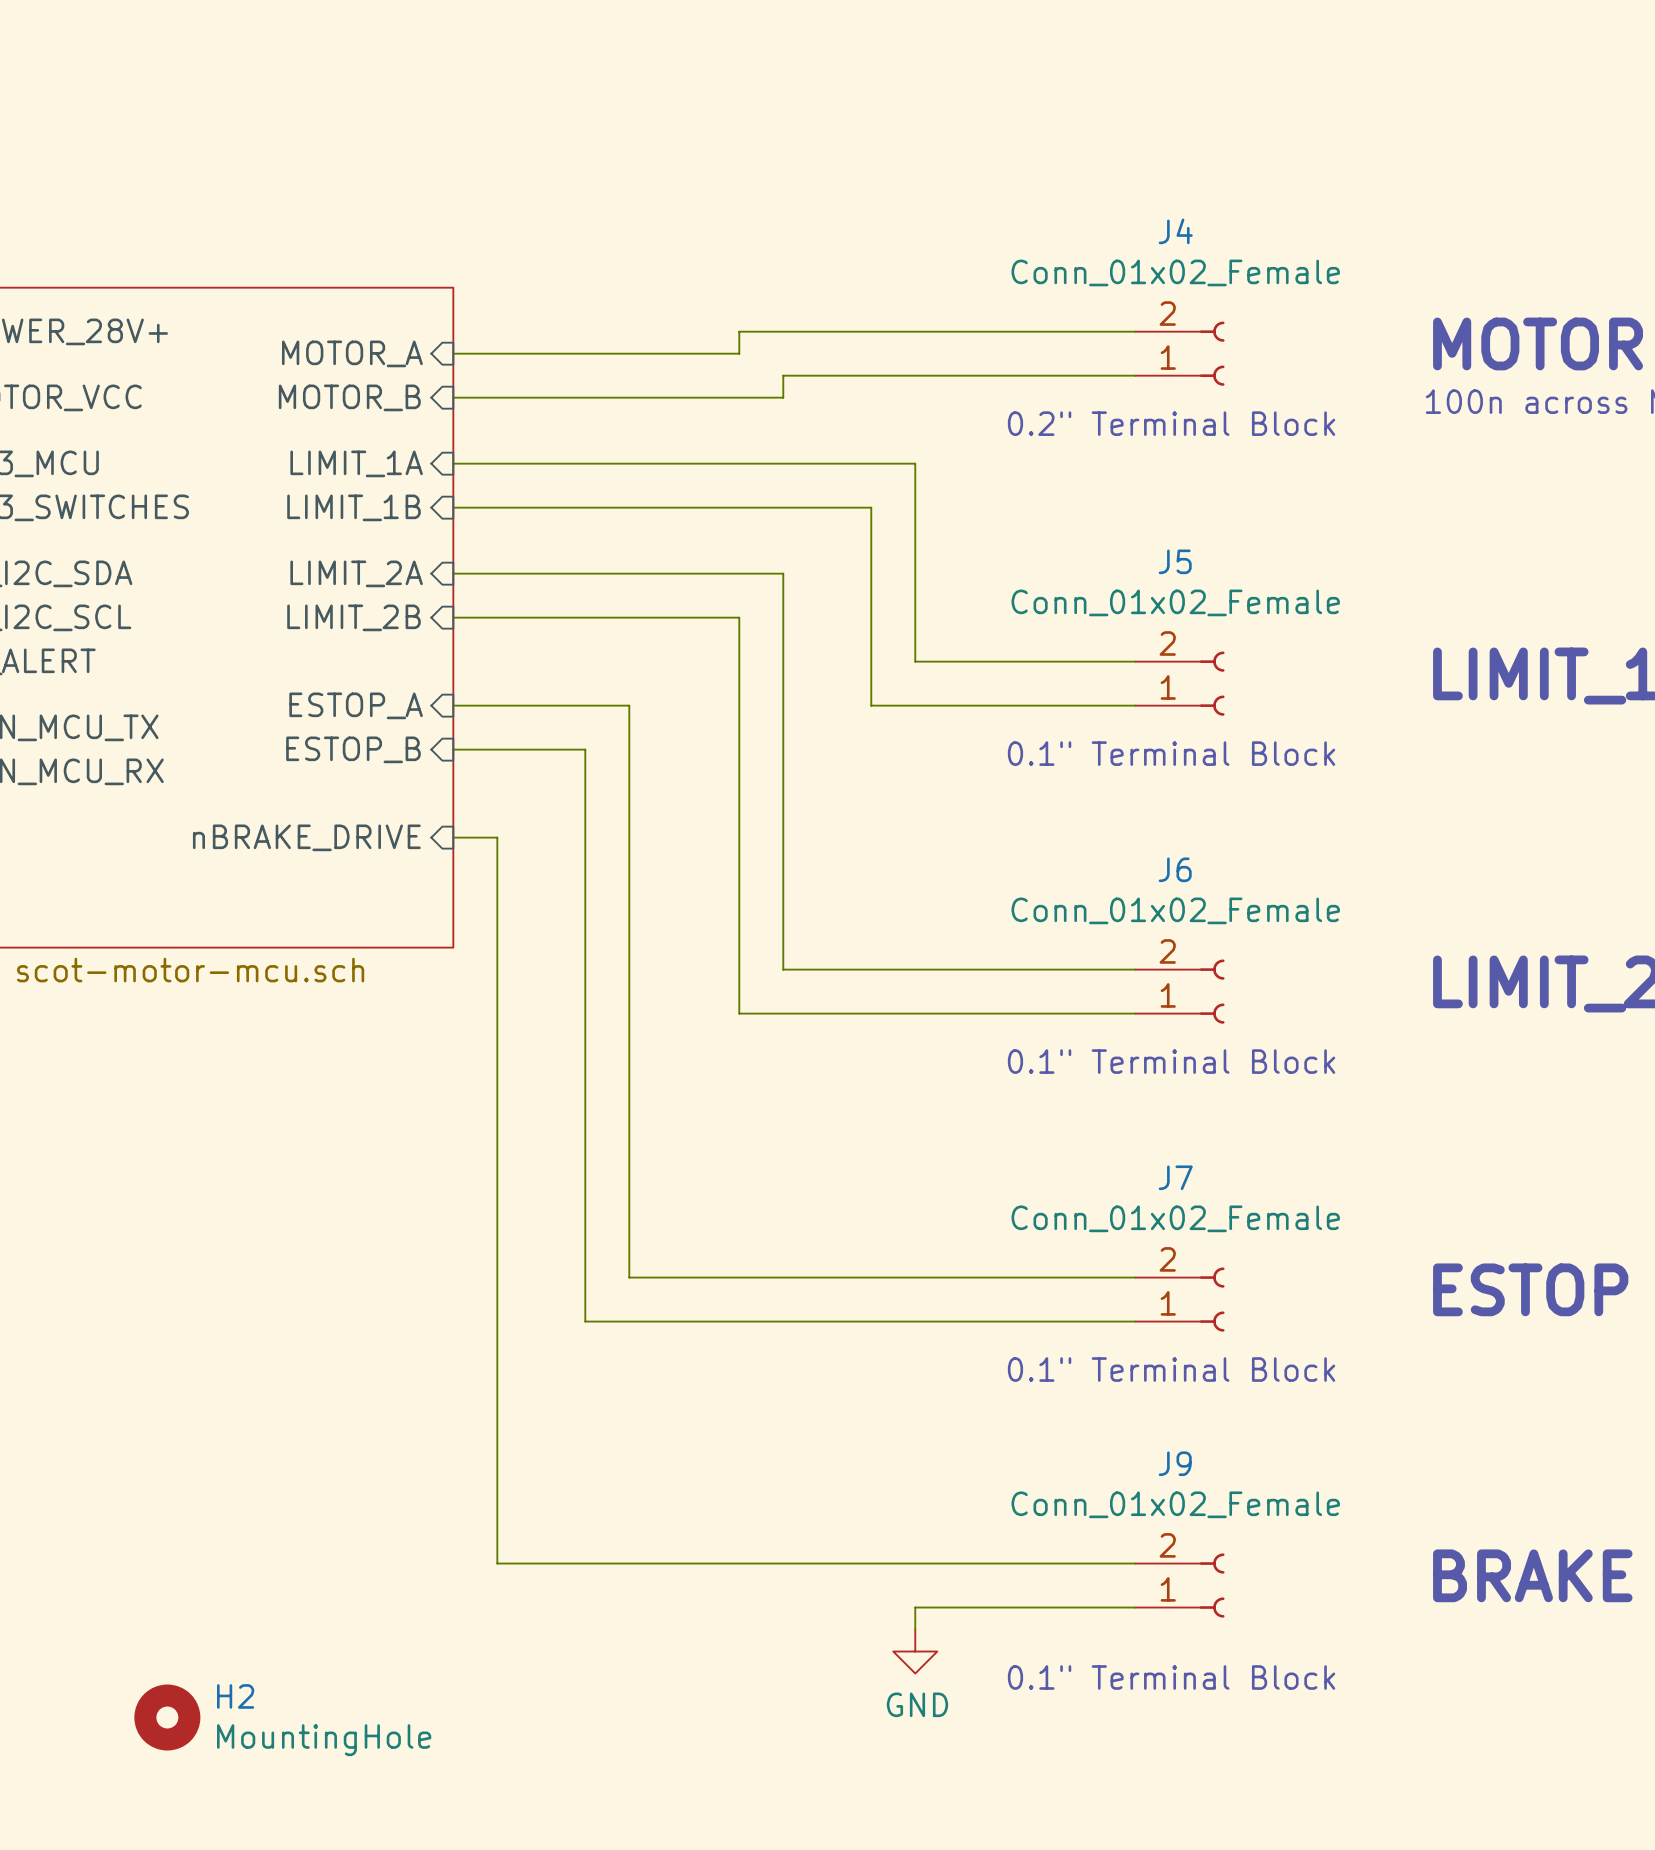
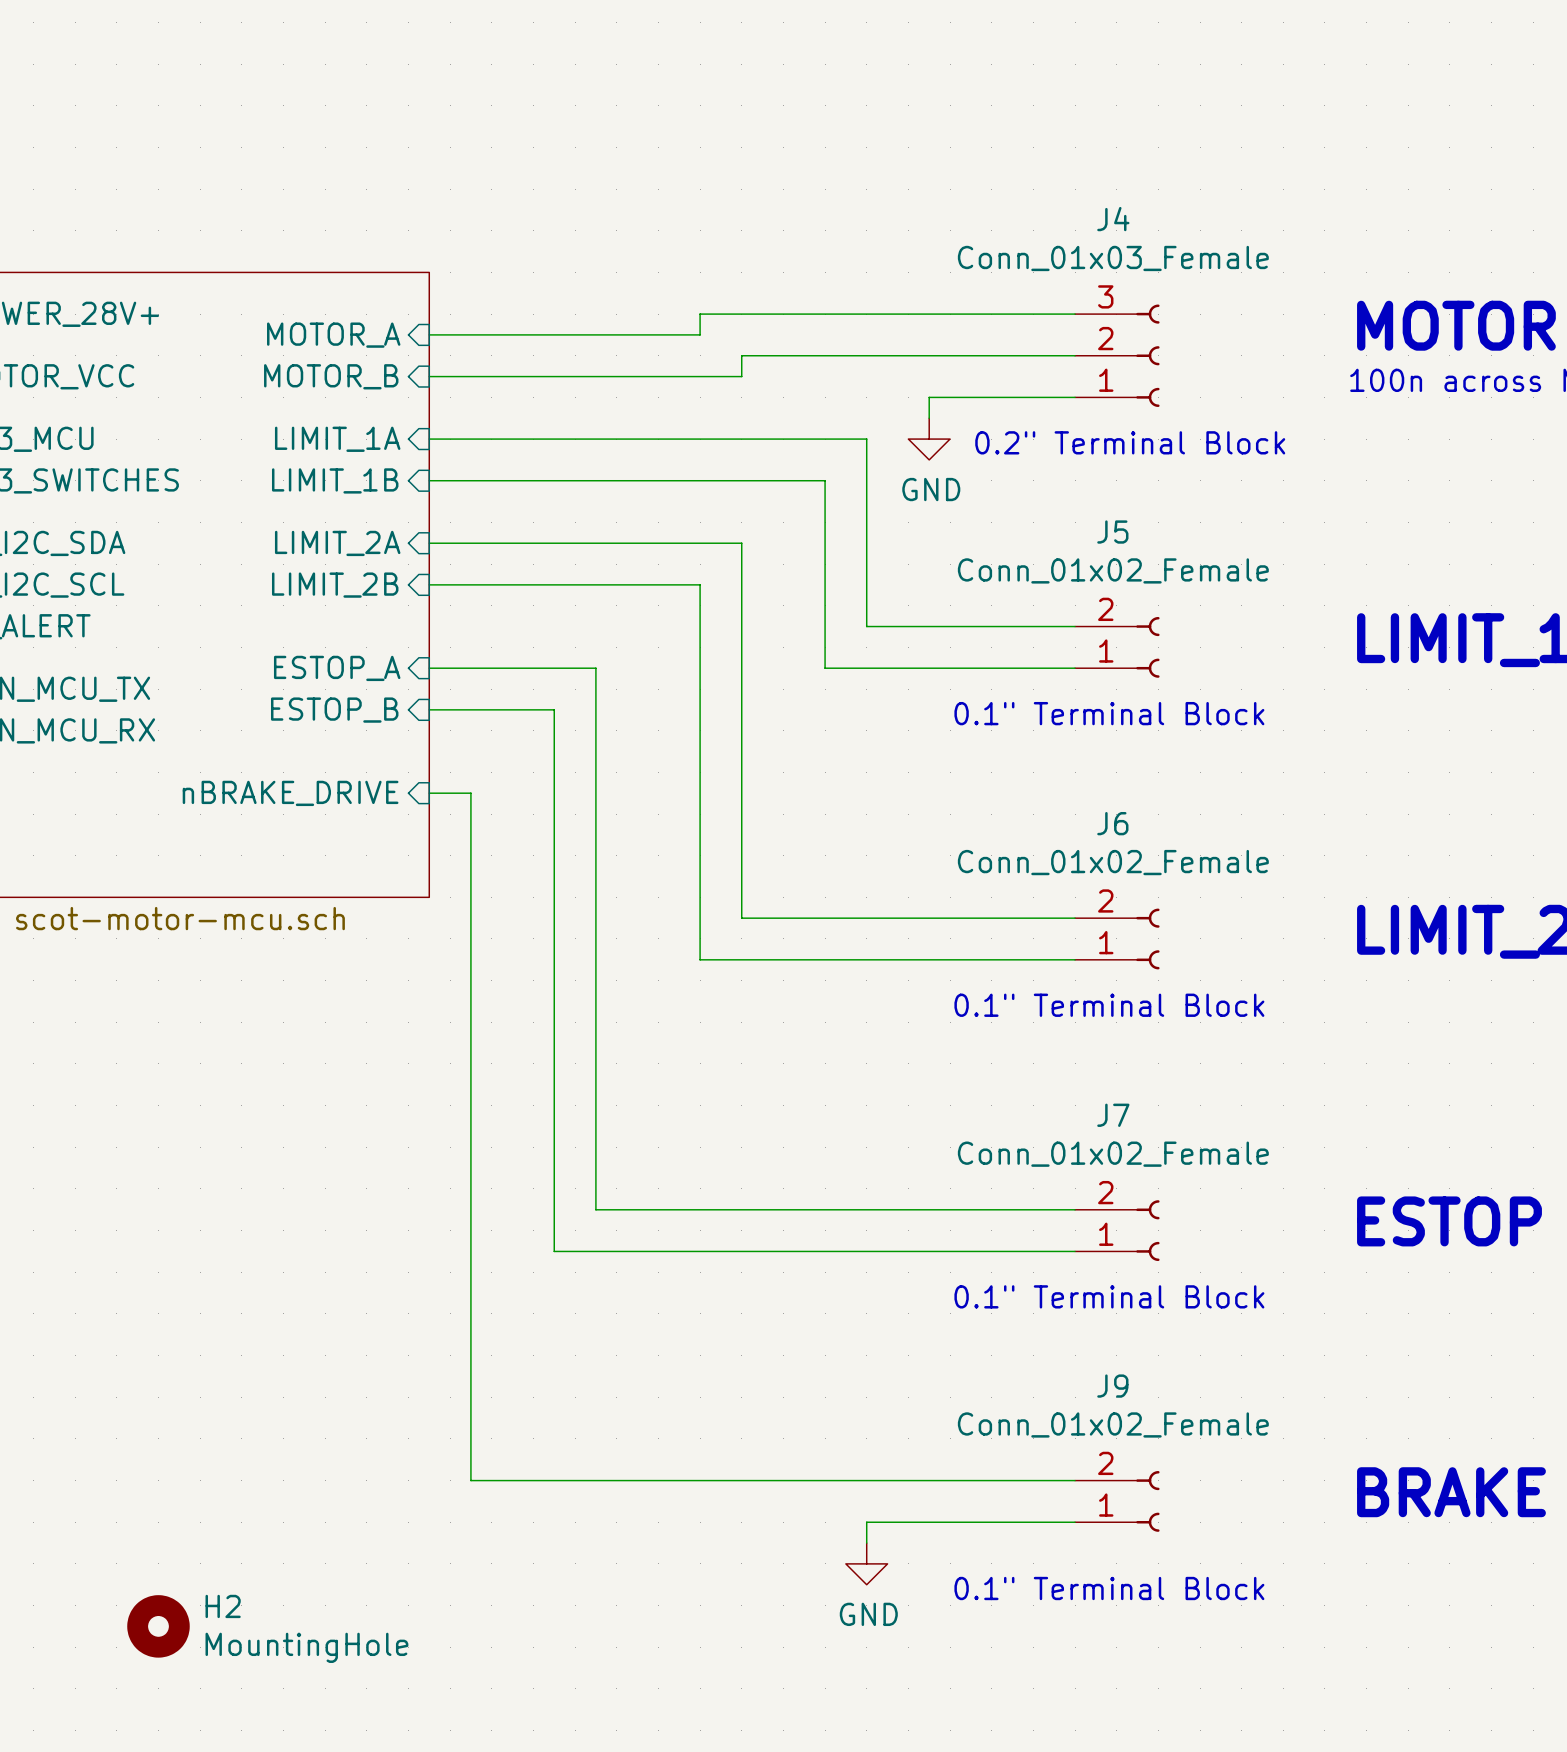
J4 value: Conn_01x02_Female (1175, 272) -> Conn_01x03_Female (1113, 258)
J4 symbol: [1135, 321, 1225, 386] -> [1075, 304, 1160, 407]
wire: none -> (1075, 397) (929, 397) (929, 418)
text position: 0.2" Terminal Block (1171, 423) -> 0.2" Terminal Block (1130, 442)
power symbol: none -> GND (929, 439)

